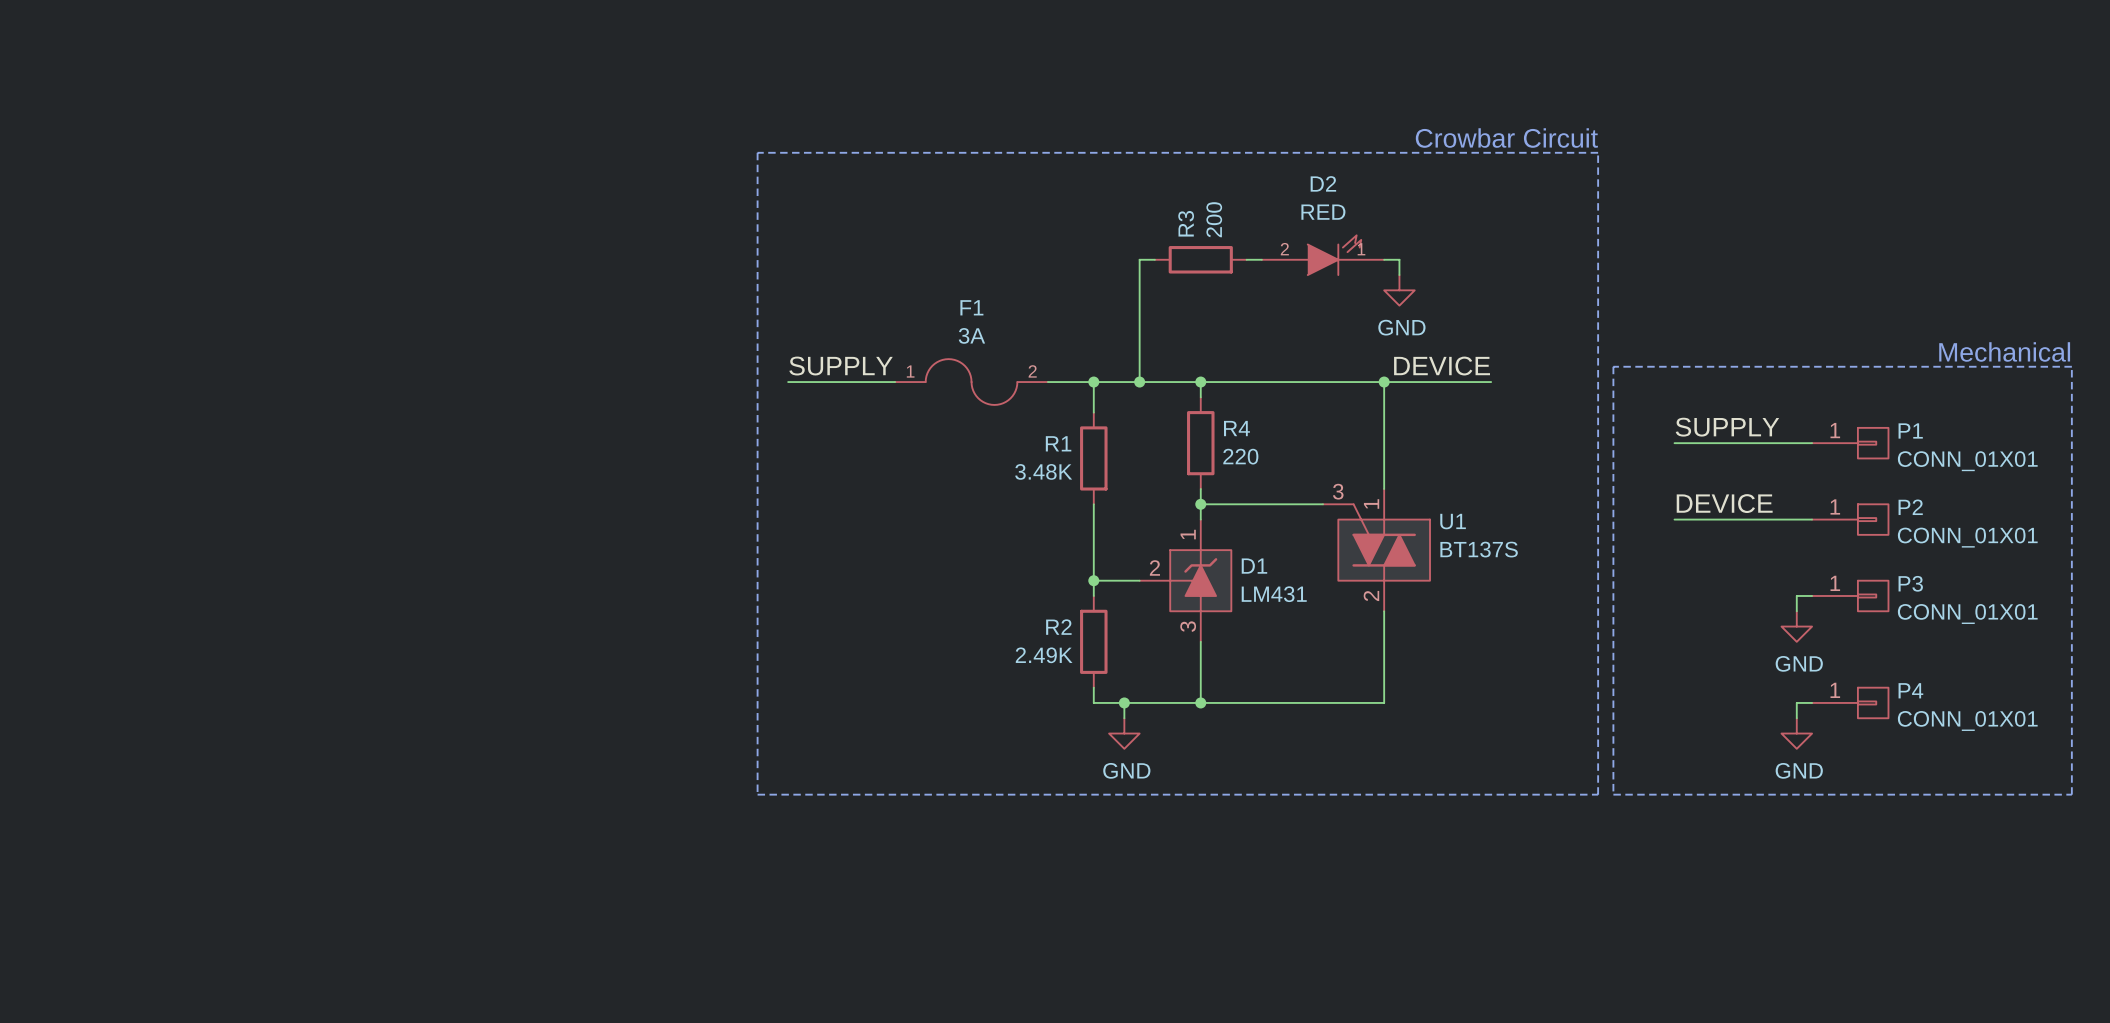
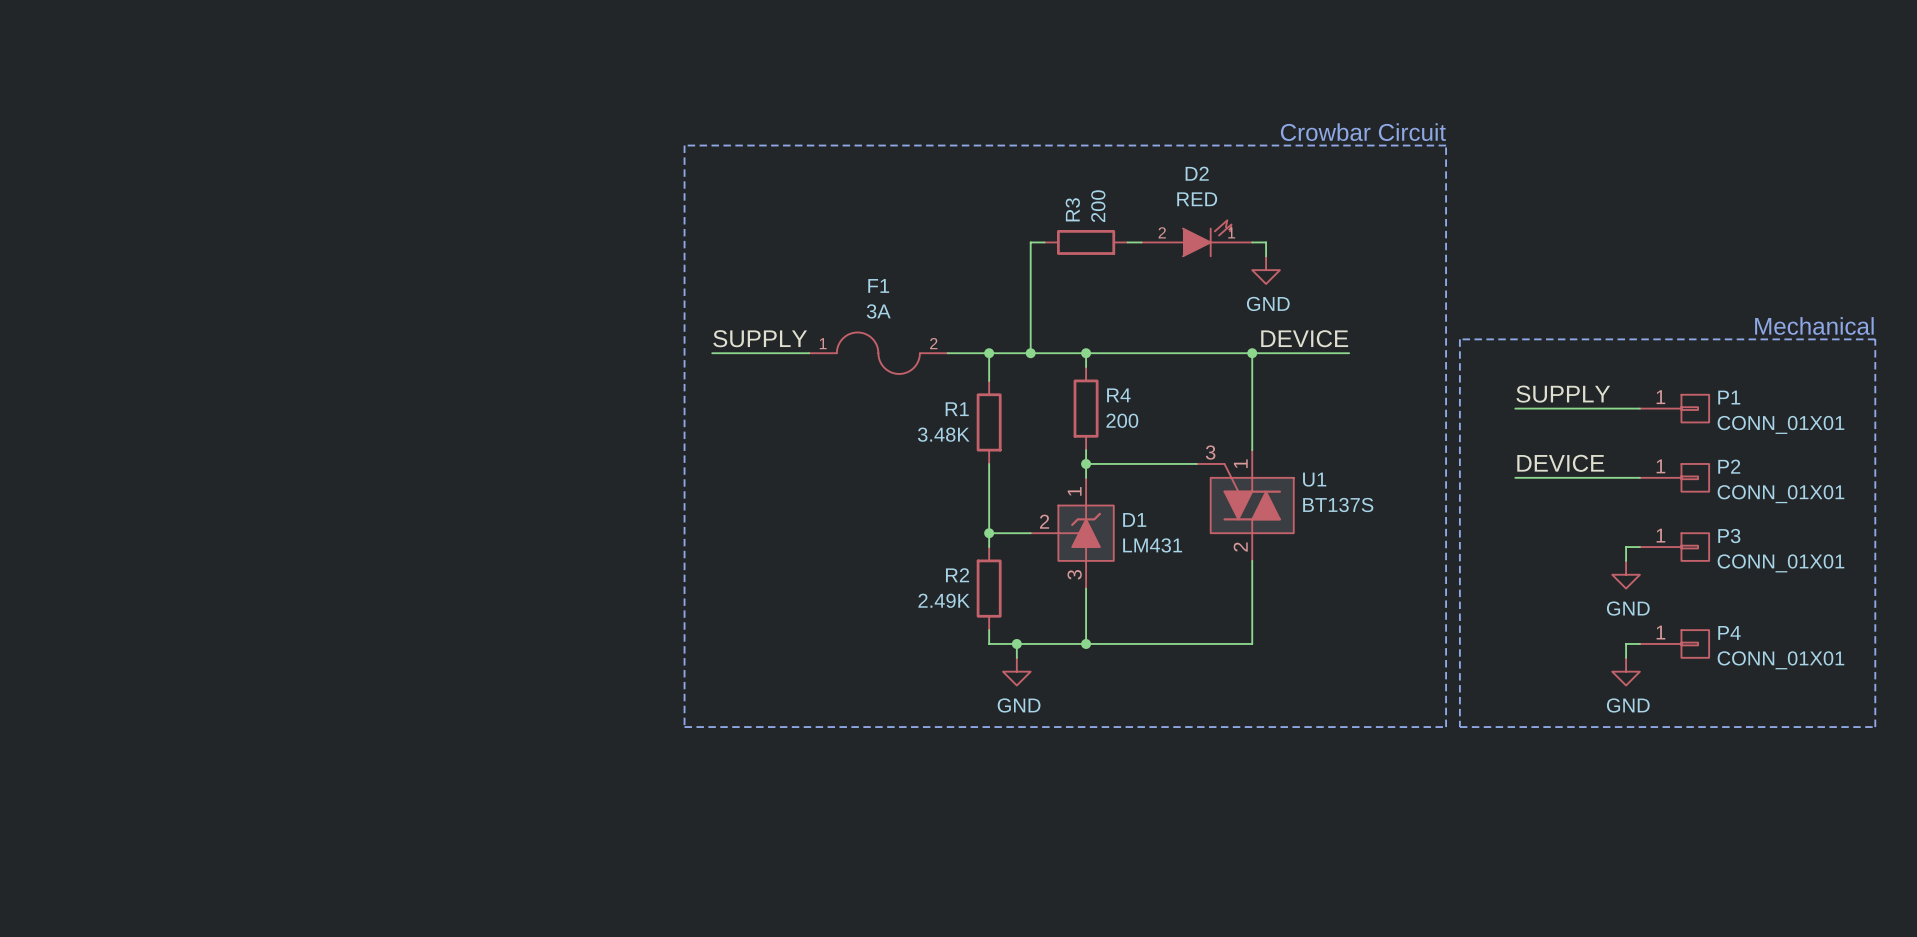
R4 value: 220 (1240, 456) -> 200 (1122, 420)

